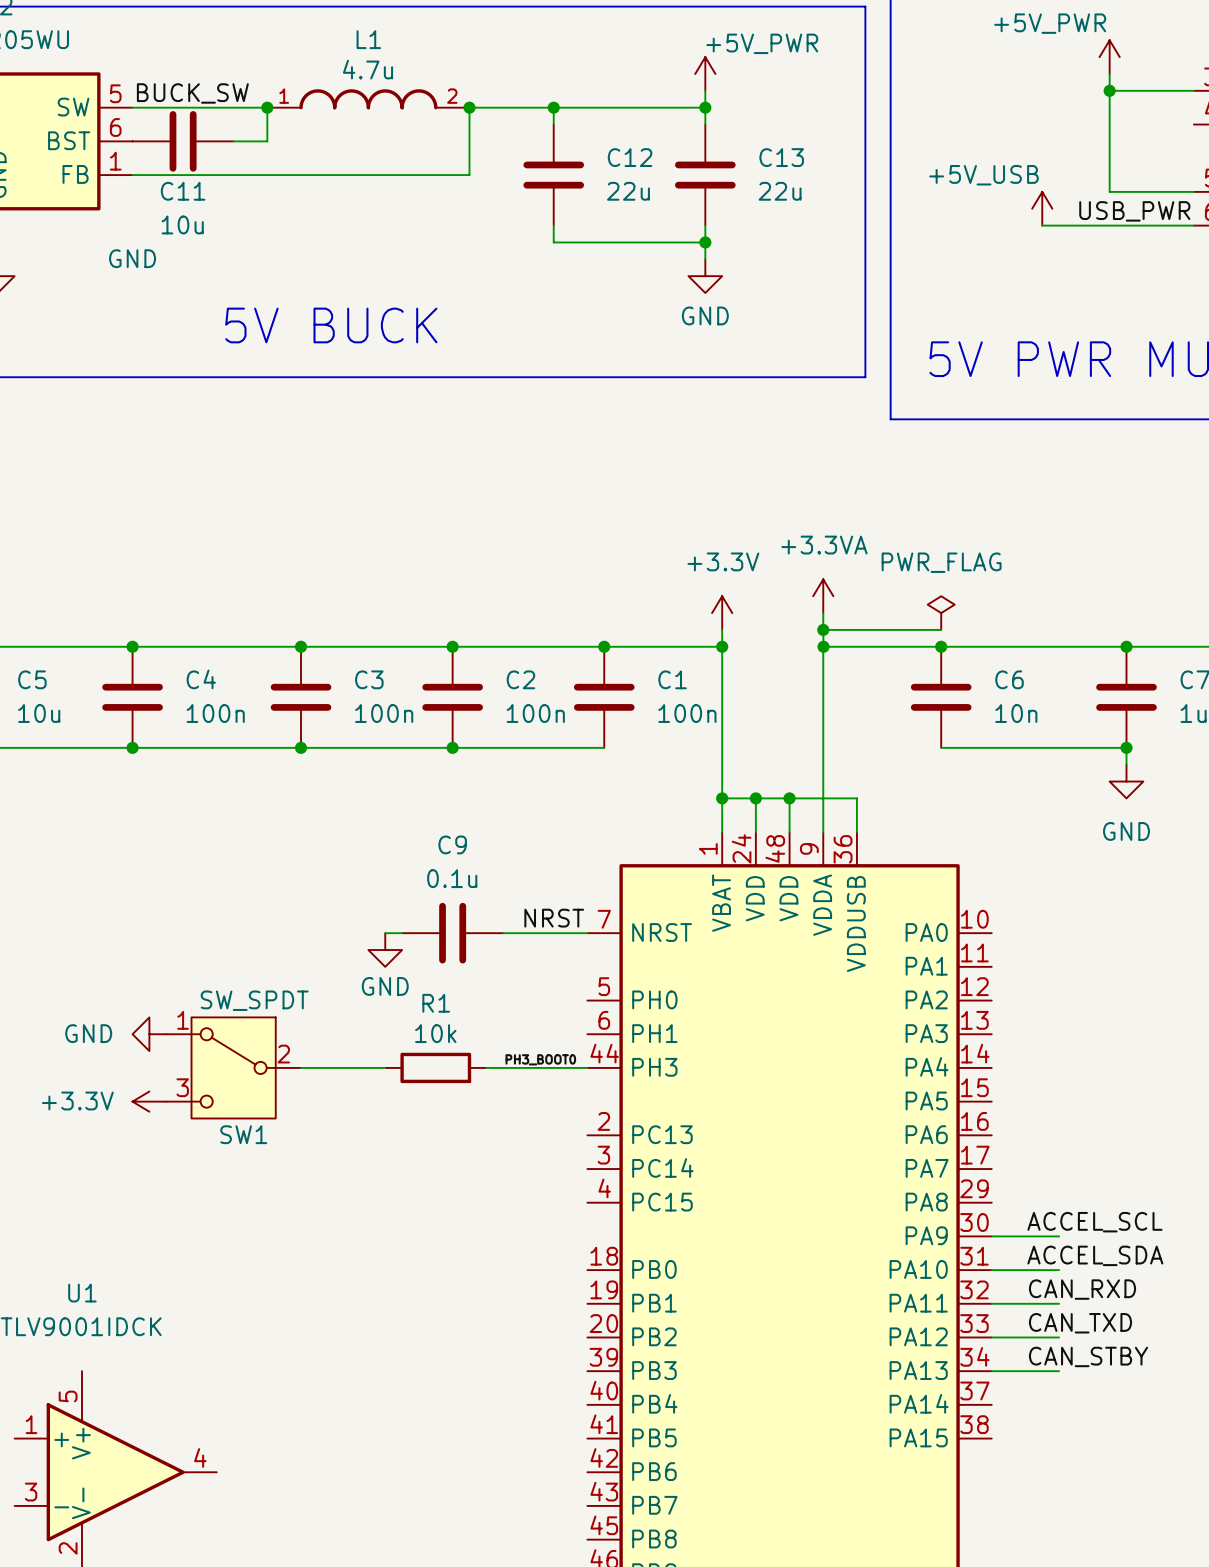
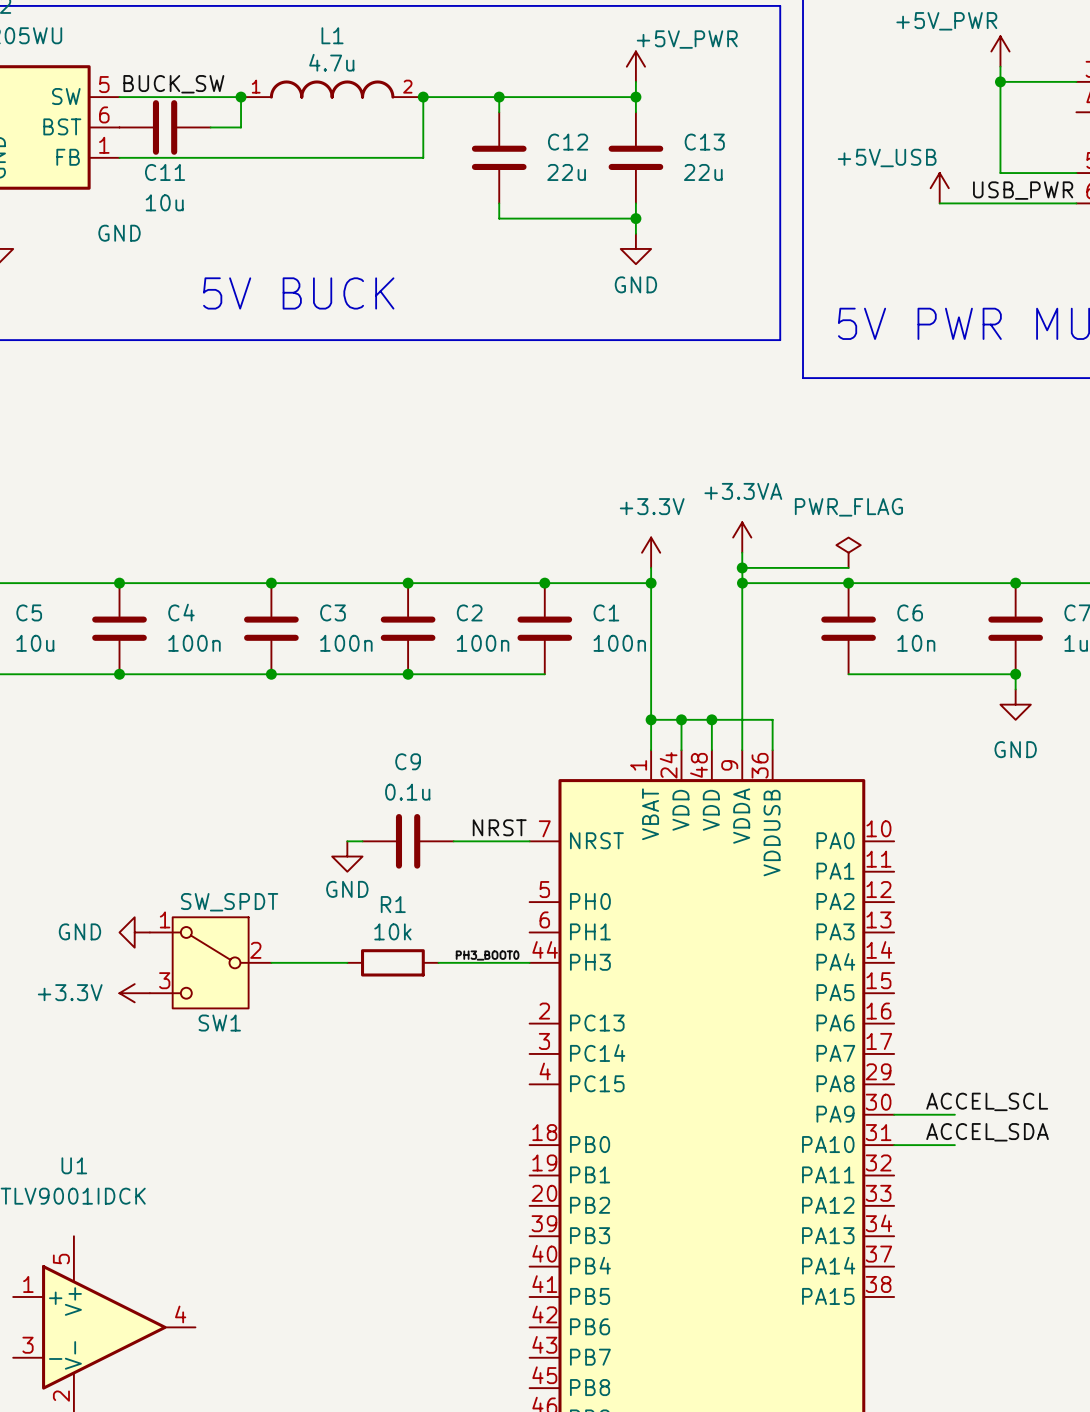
label: CAN_RXD (1082, 1289) -> none
wire: (991, 1303) (1059, 1303) -> none
label: CAN_TXD (1080, 1323) -> none
wire: (991, 1337) (1059, 1337) -> none
label: CAN_STBY (1088, 1356) -> none
wire: (991, 1371) (1059, 1371) -> none

